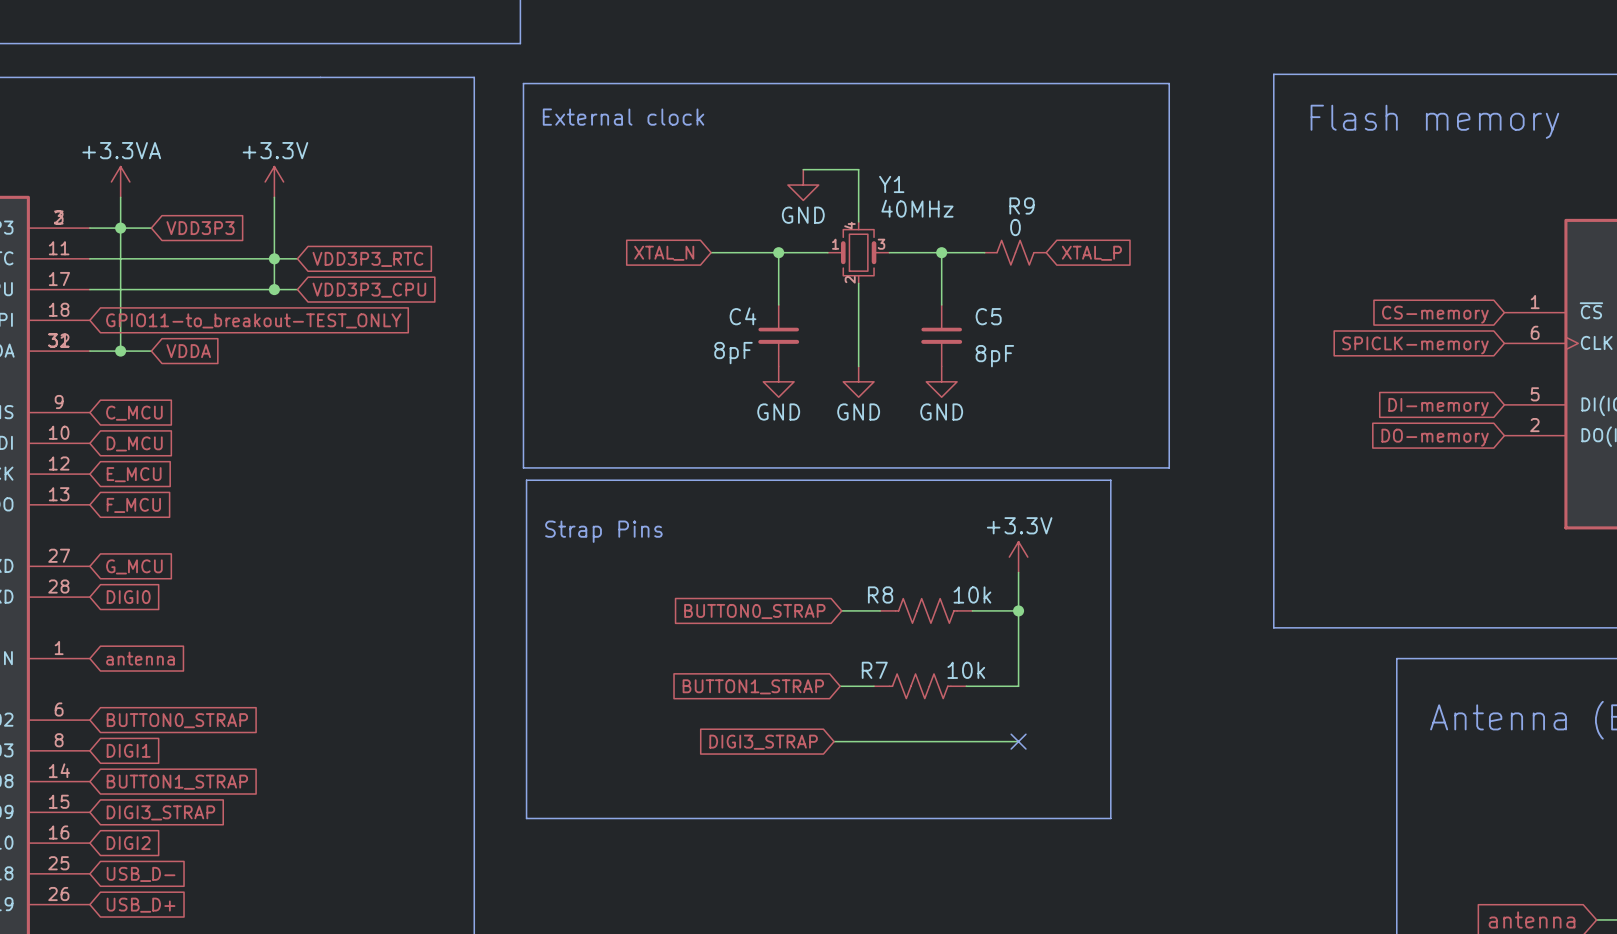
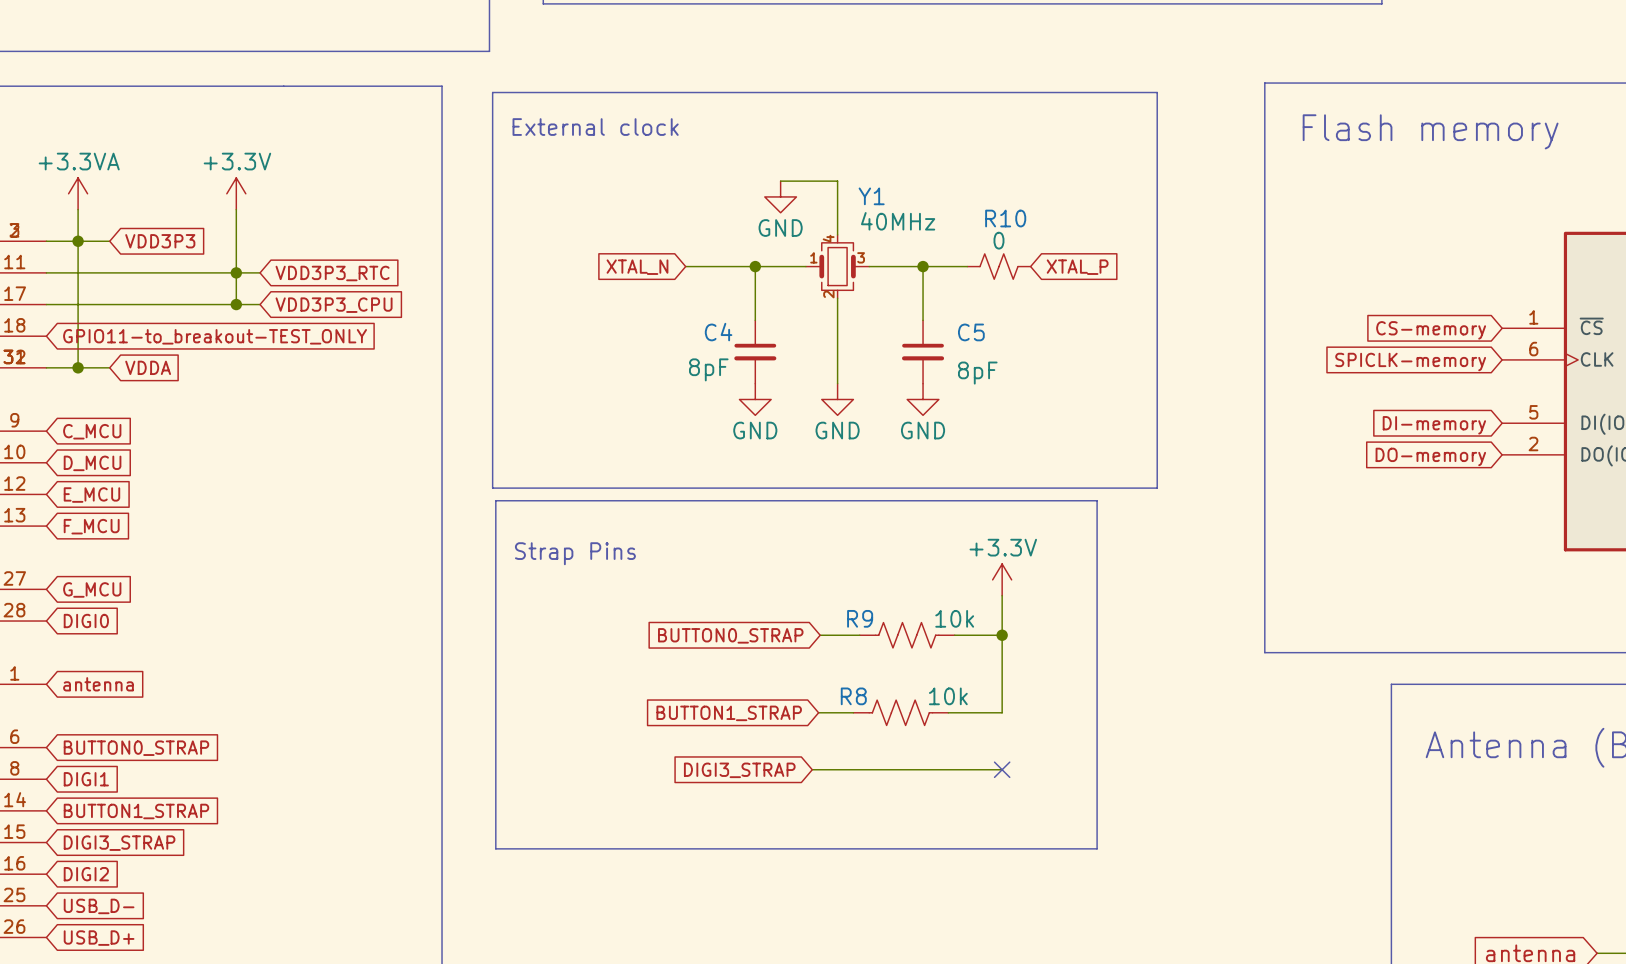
R9 name: R9 (1022, 205) -> R10 (1005, 218)
R8 name: R8 (880, 594) -> R9 (860, 618)
R7 name: R7 (874, 670) -> R8 (853, 696)

